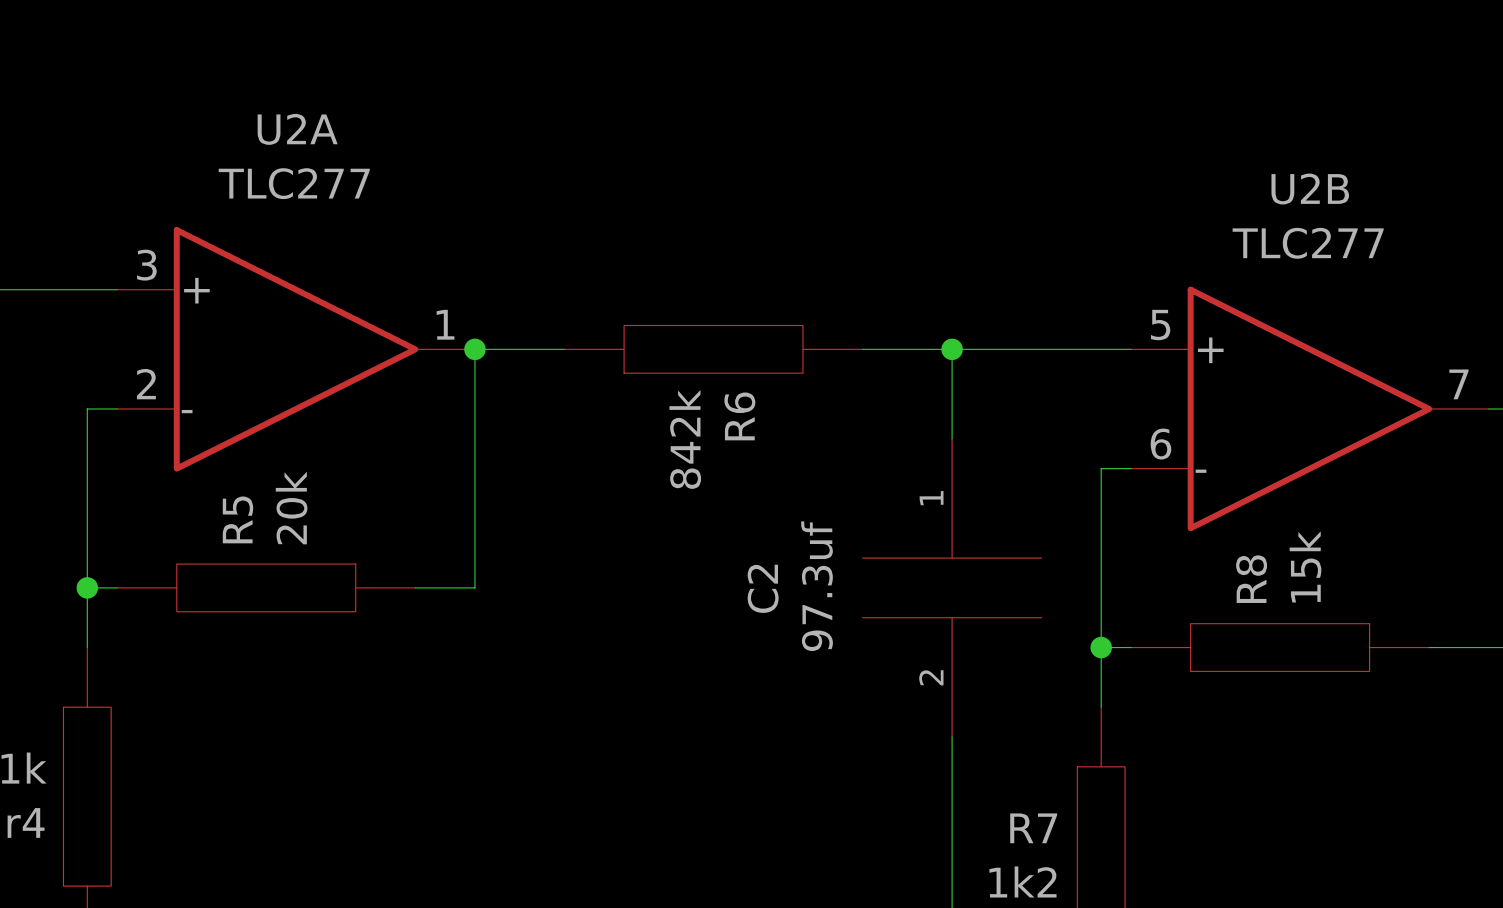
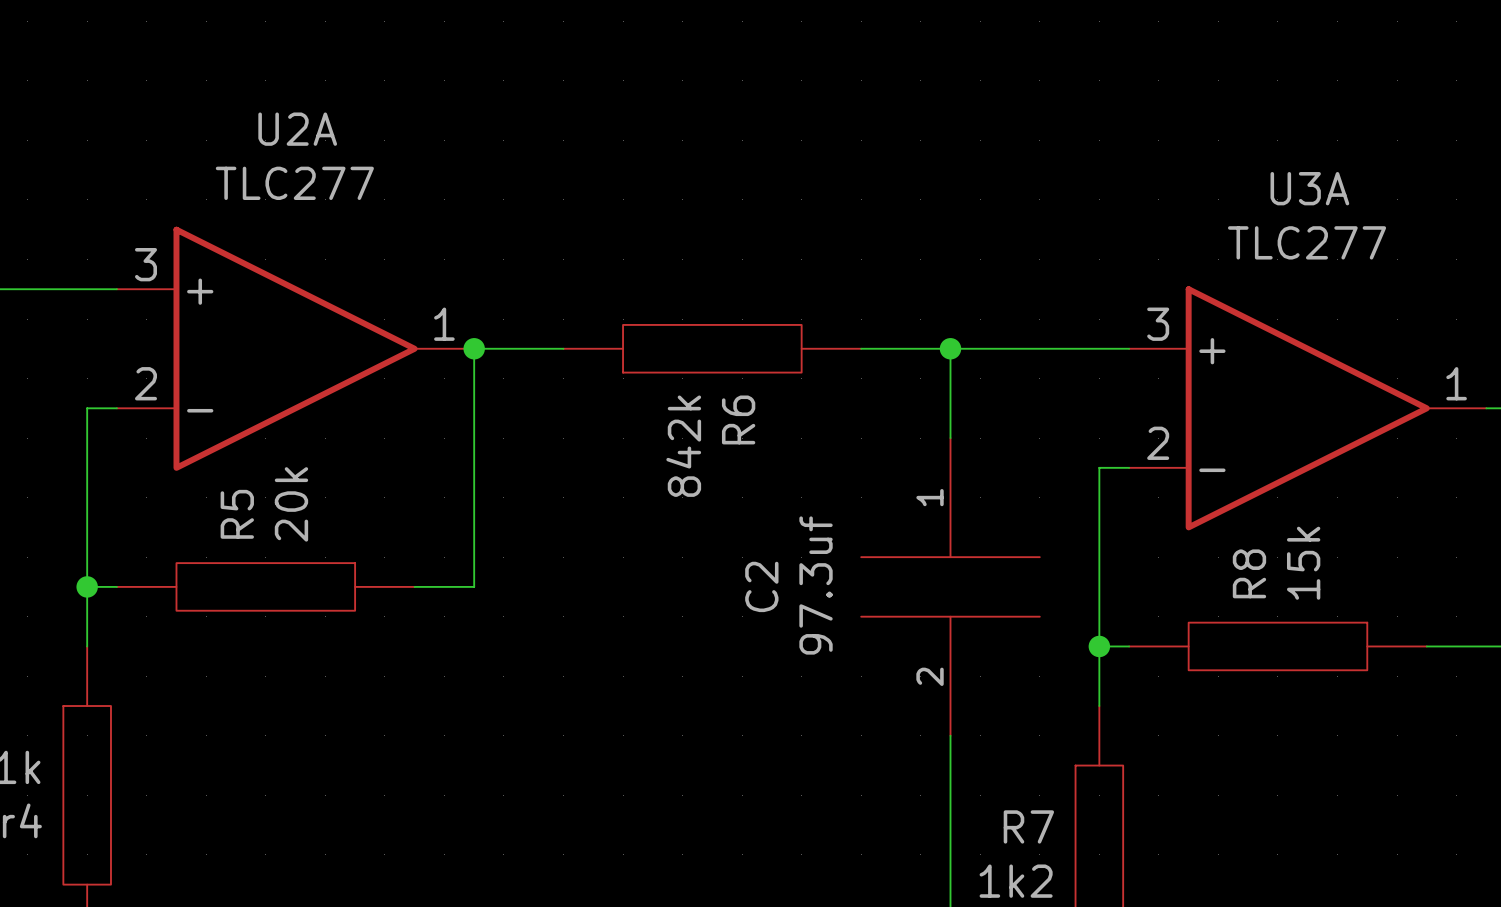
U2B name: U2B (1310, 189) -> U3A (1309, 188)
U2B pin number: 5 (1160, 325) -> 3 (1158, 324)
U2B pin number: 7 (1458, 384) -> 1 (1456, 383)
U2B pin number: 6 (1160, 444) -> 2 (1158, 443)

